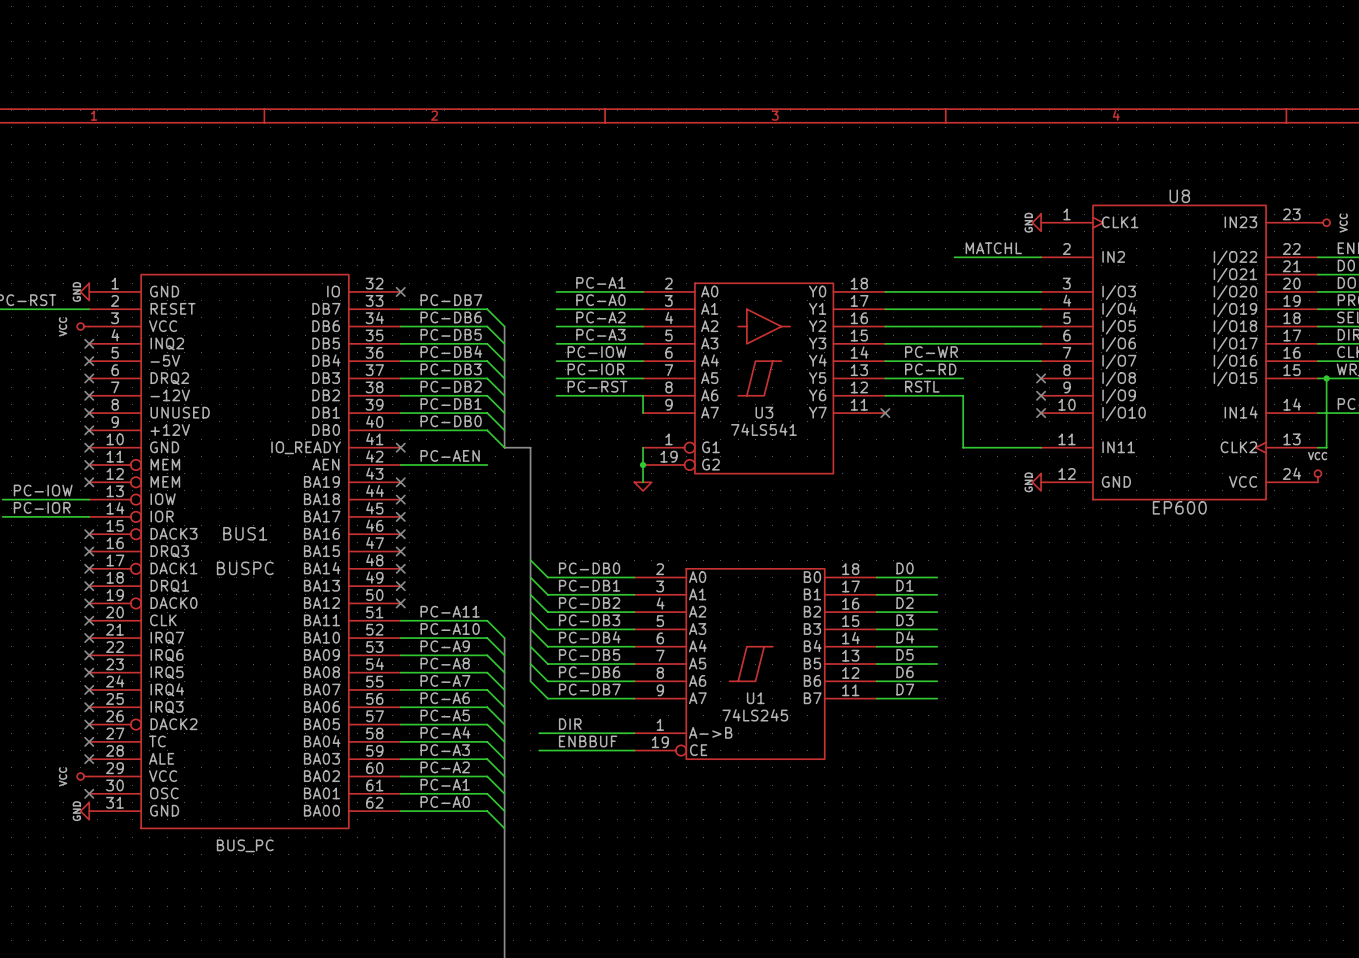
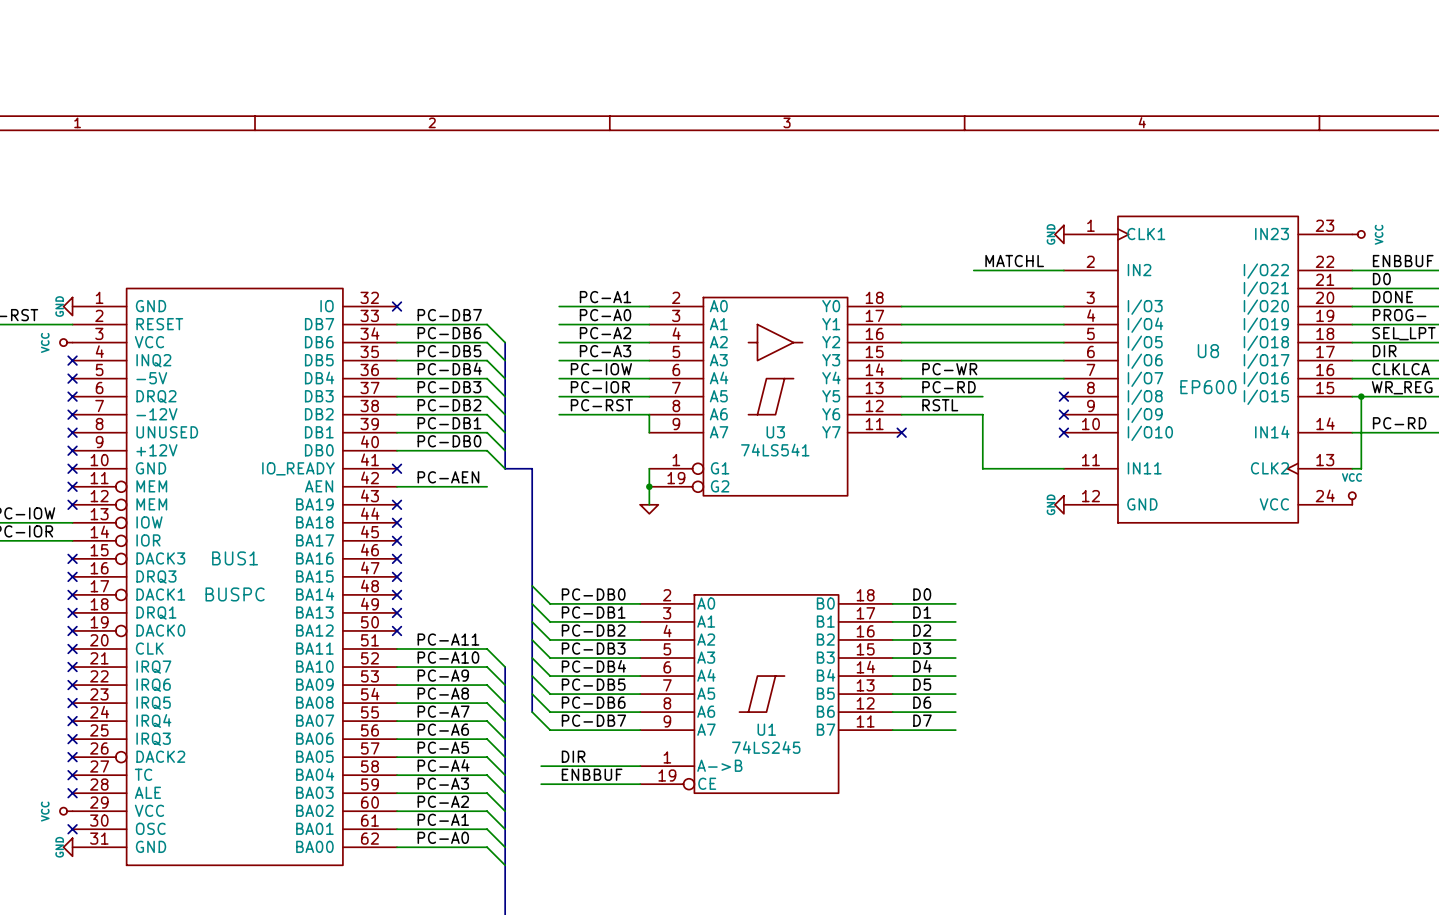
U8 name position: U8 (1179, 196) -> U8 (1208, 351)
U8 value position: EP600 (1179, 507) -> EP600 (1208, 387)
BUS1 text: BUS_PC (245, 845) -> none

